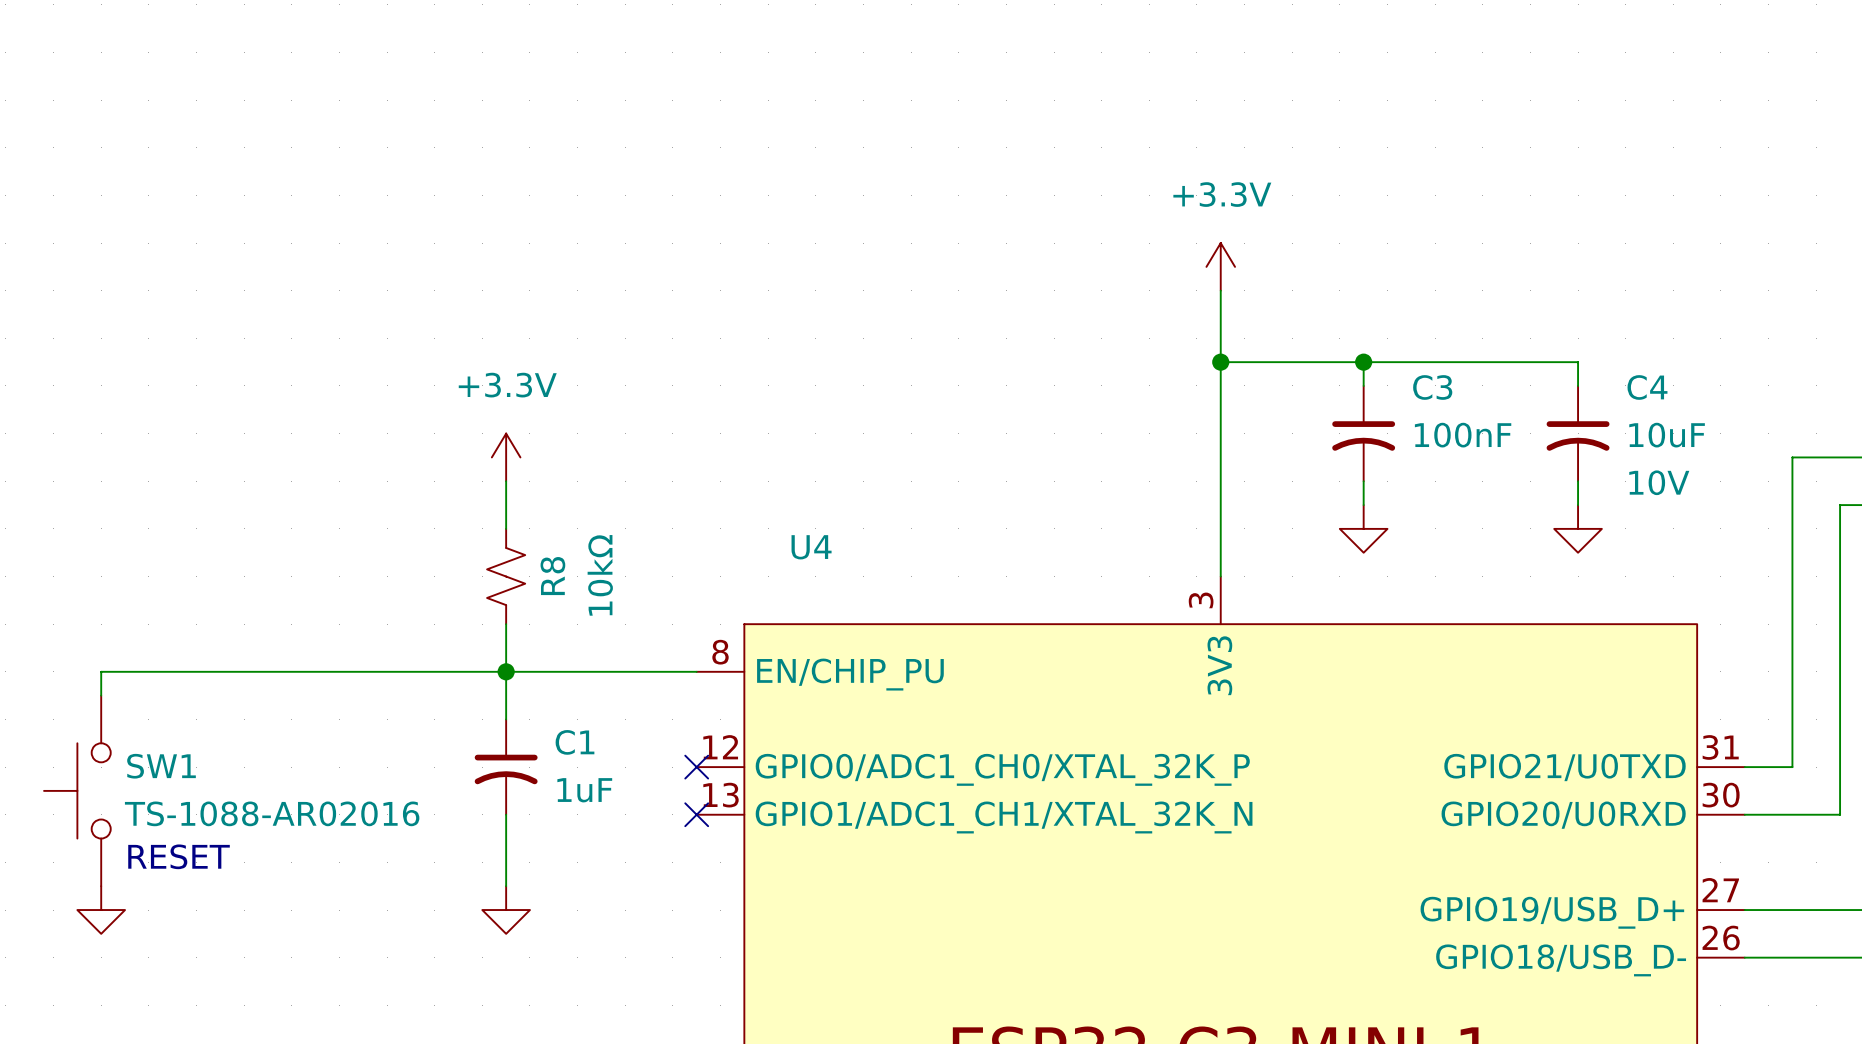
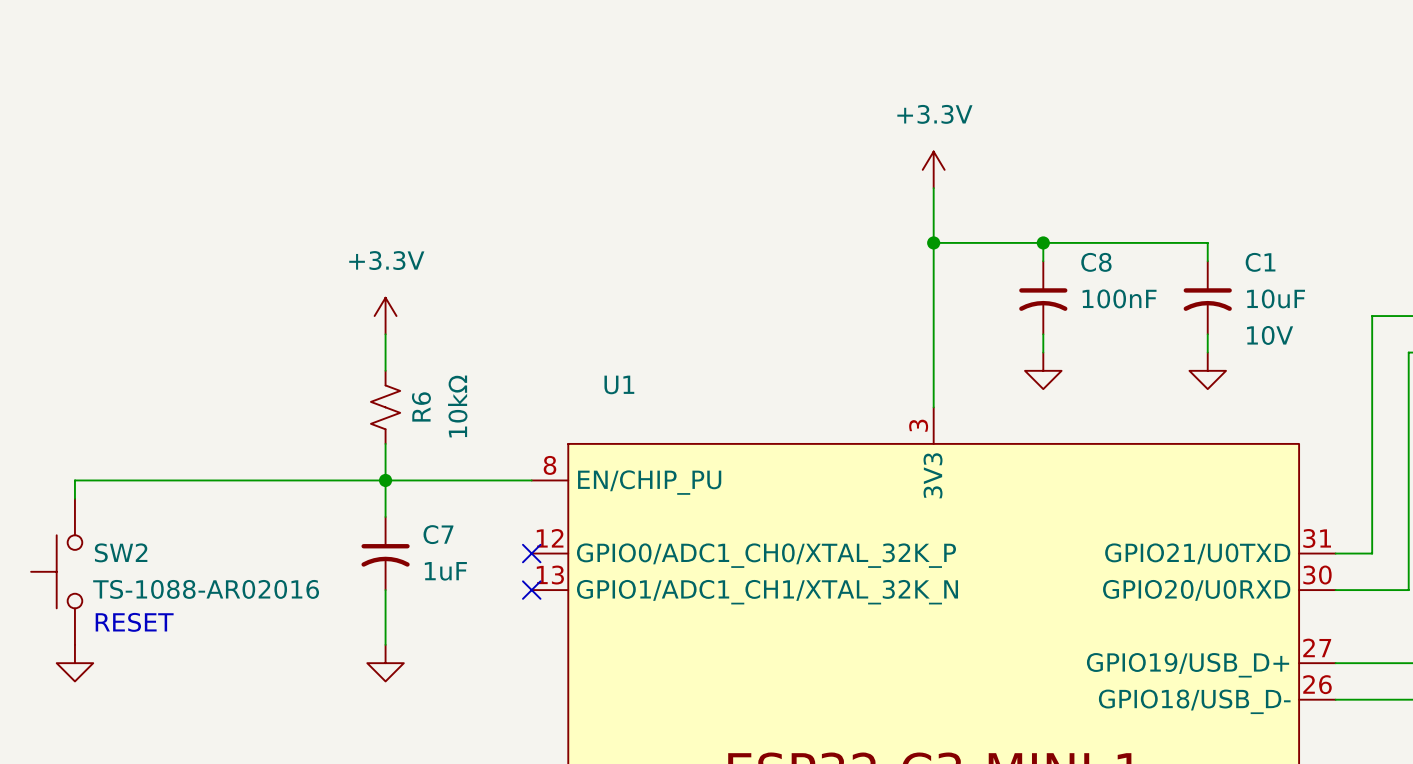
C3 name: C3 (1432, 387) -> C8 (1096, 262)
C4 name: C4 (1647, 387) -> C1 (1260, 262)
U4 name: U4 (811, 547) -> U1 (619, 384)
R8 name: R8 (552, 576) -> R6 (421, 406)
C1 name: C1 (574, 742) -> C7 (438, 534)
SW1 name: SW1 (161, 766) -> SW2 (121, 552)

